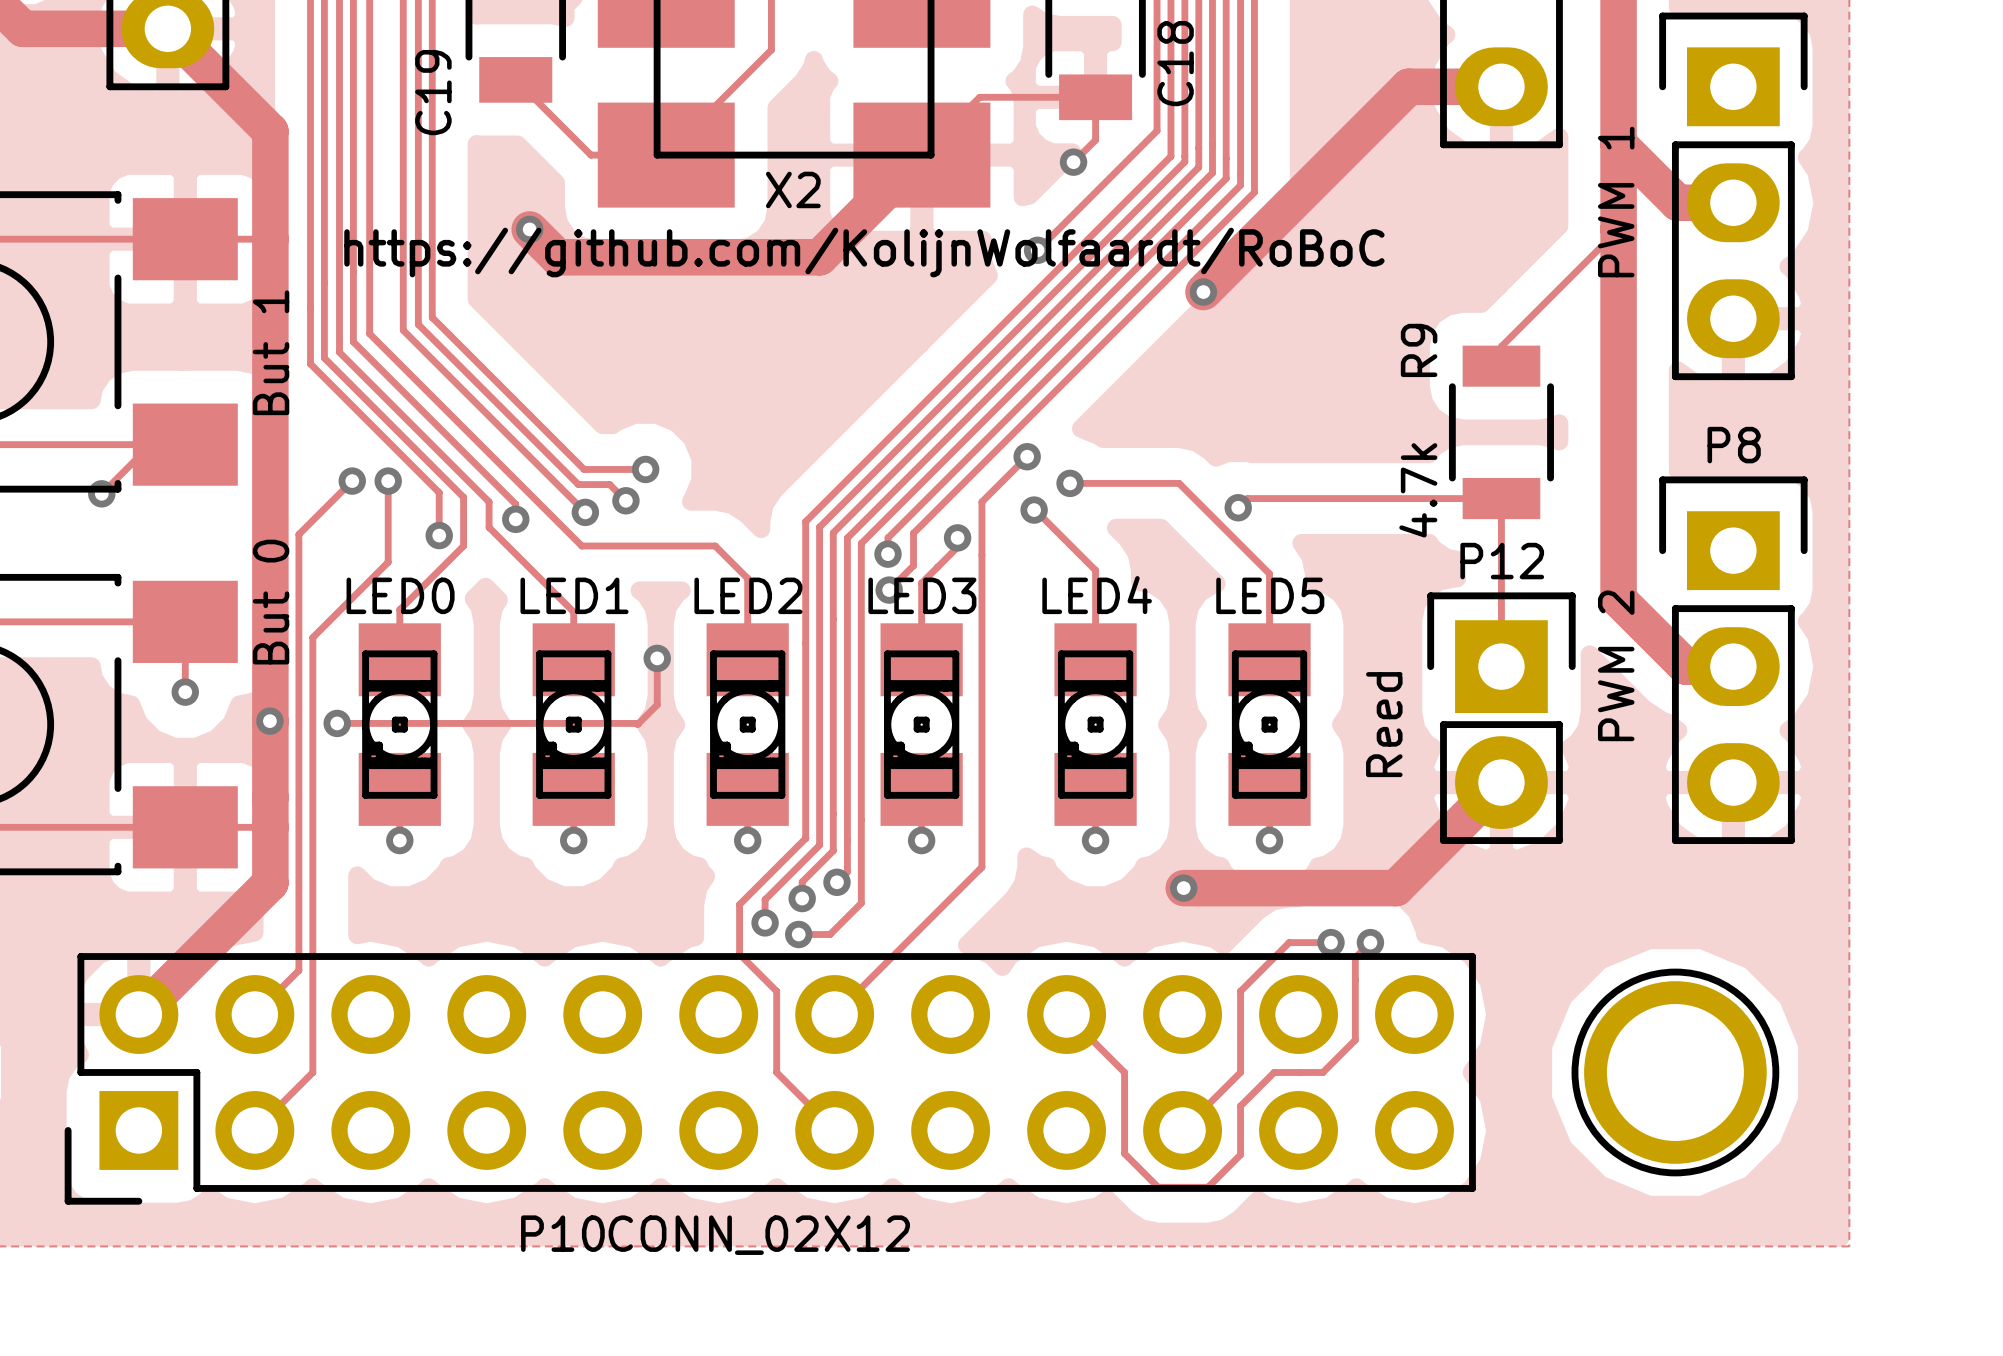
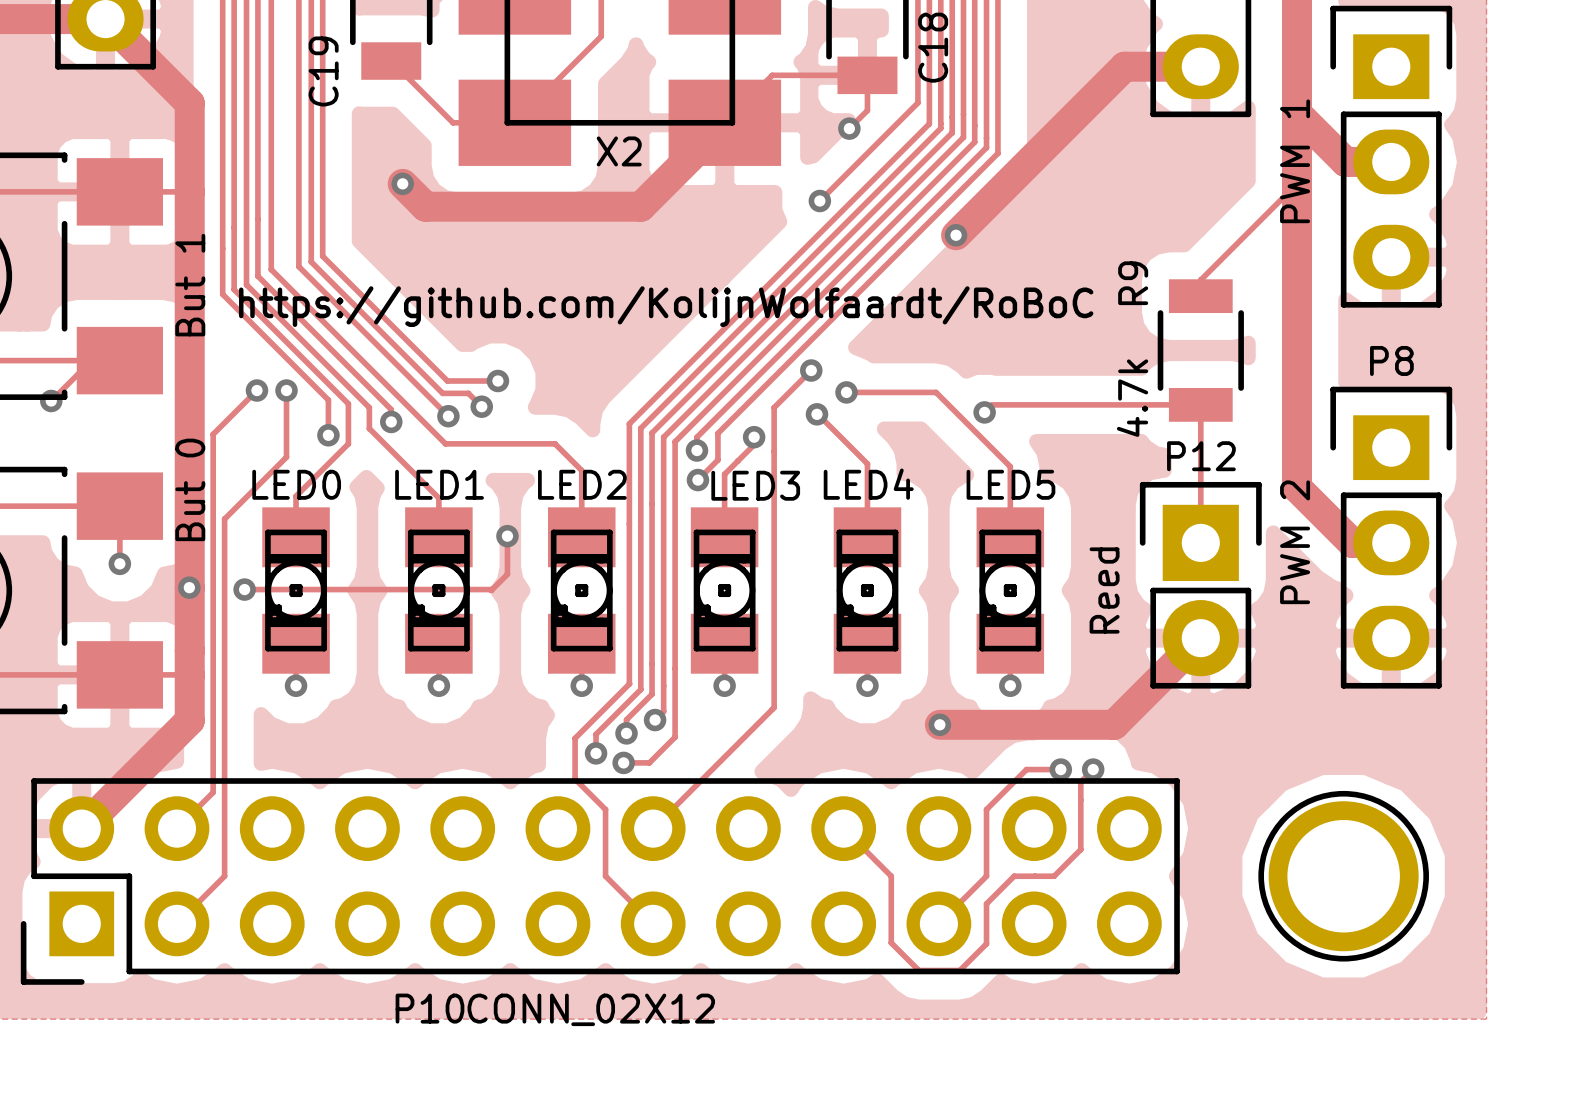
text position: https://github.com/KolijnWolfaardt/RoBoC (864, 252) -> https://github.com/KolijnWolfaardt/RoBoC (666, 306)
part value position: LED3 (922, 595) -> LED3 (755, 485)

